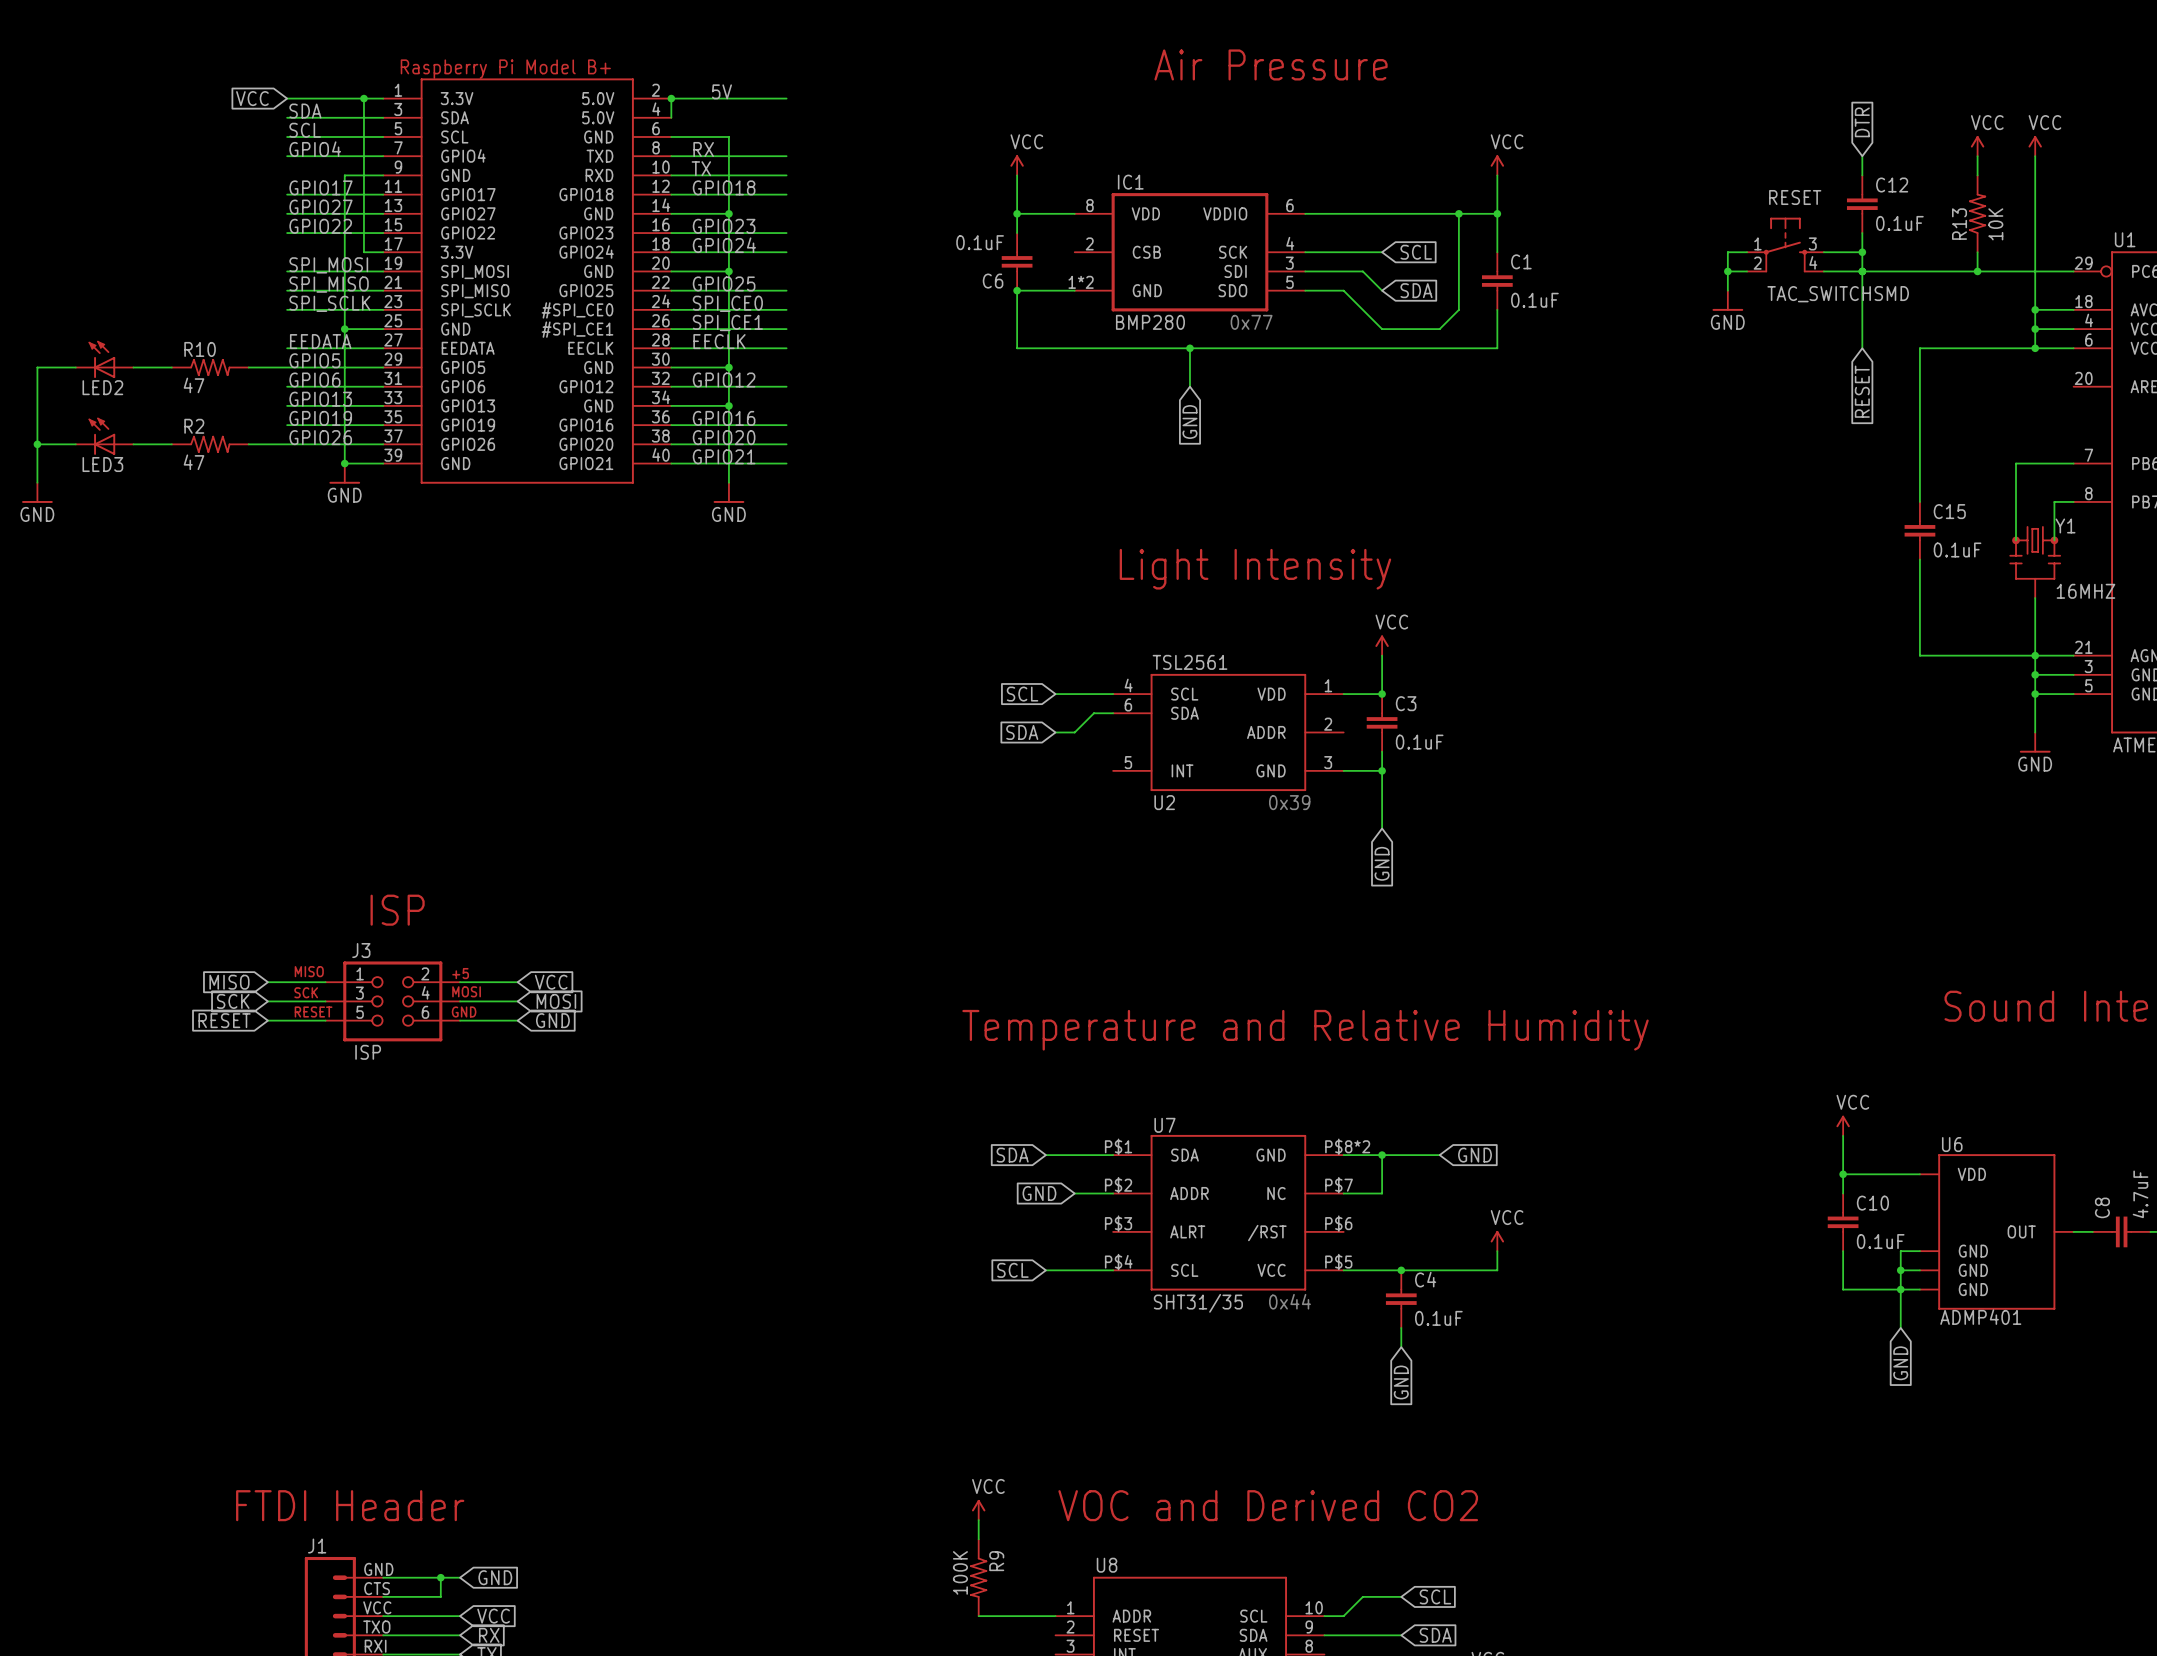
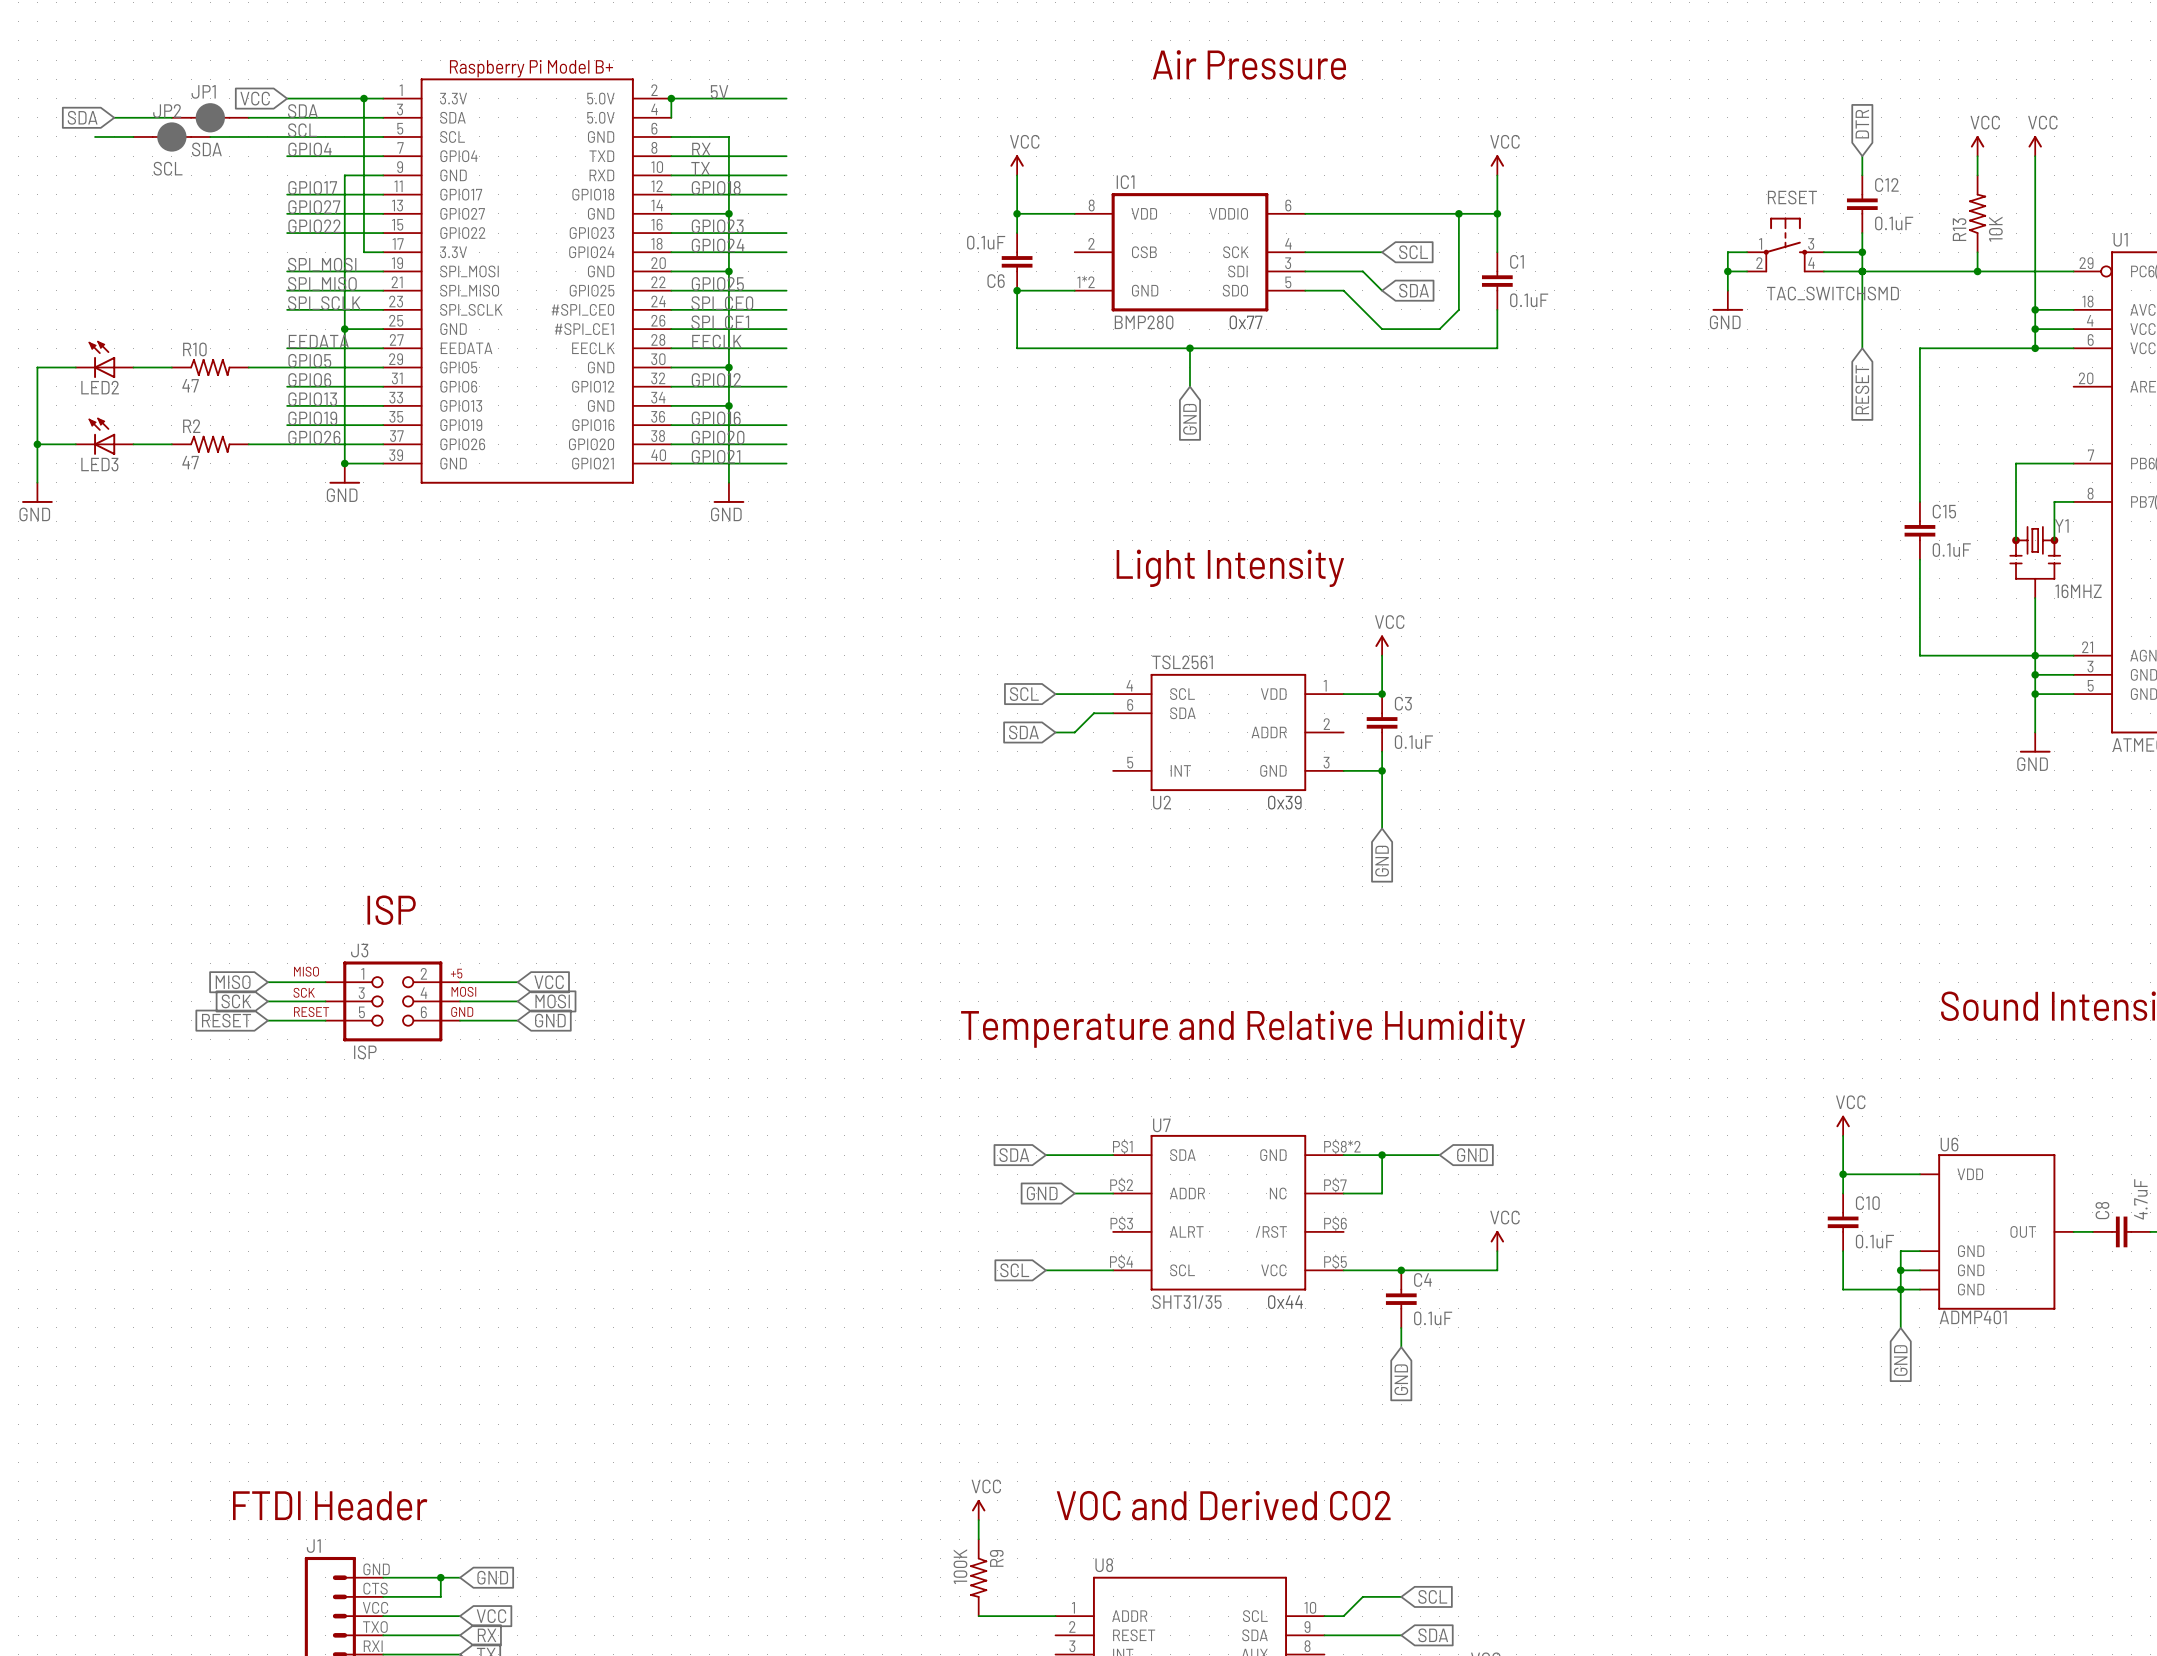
global label: none -> SDA (82, 117)
wire: none -> (114, 117) (171, 117)
JP1: none -> SDA (210, 117)
wire: none -> (248, 117) (287, 117)
wire: none -> (95, 136) (133, 136)
JP2: none -> SCL (171, 136)
wire: none -> (210, 136) (287, 136)

